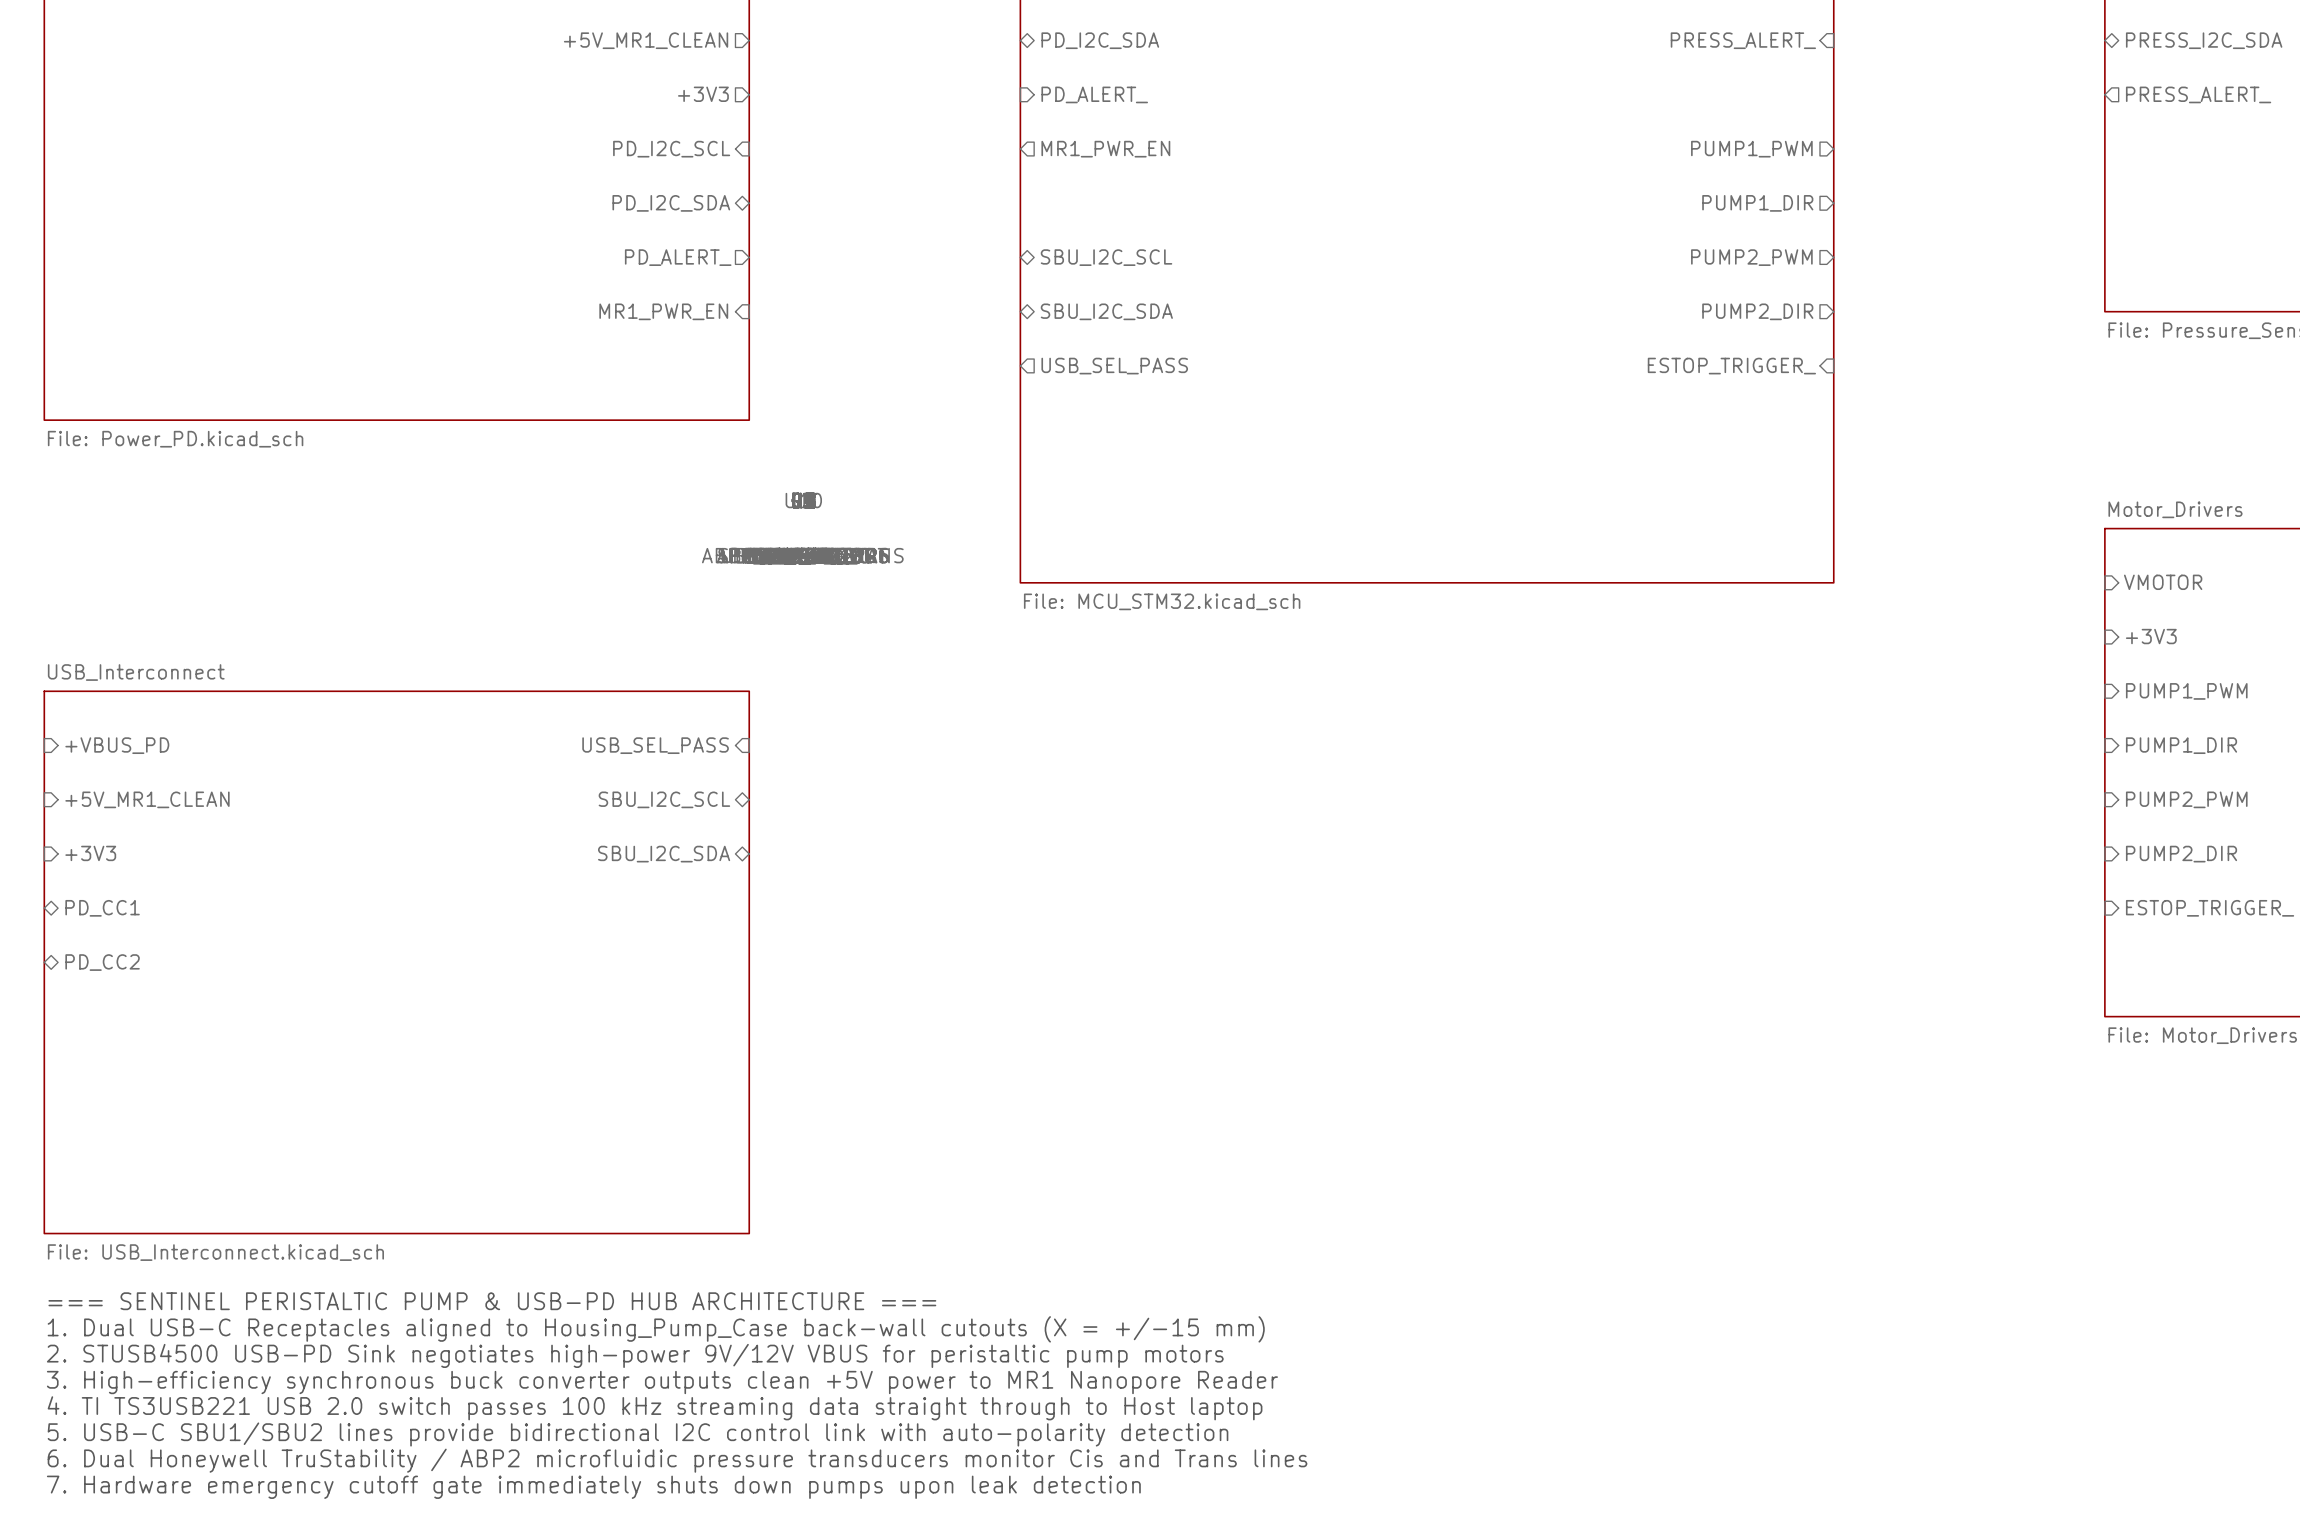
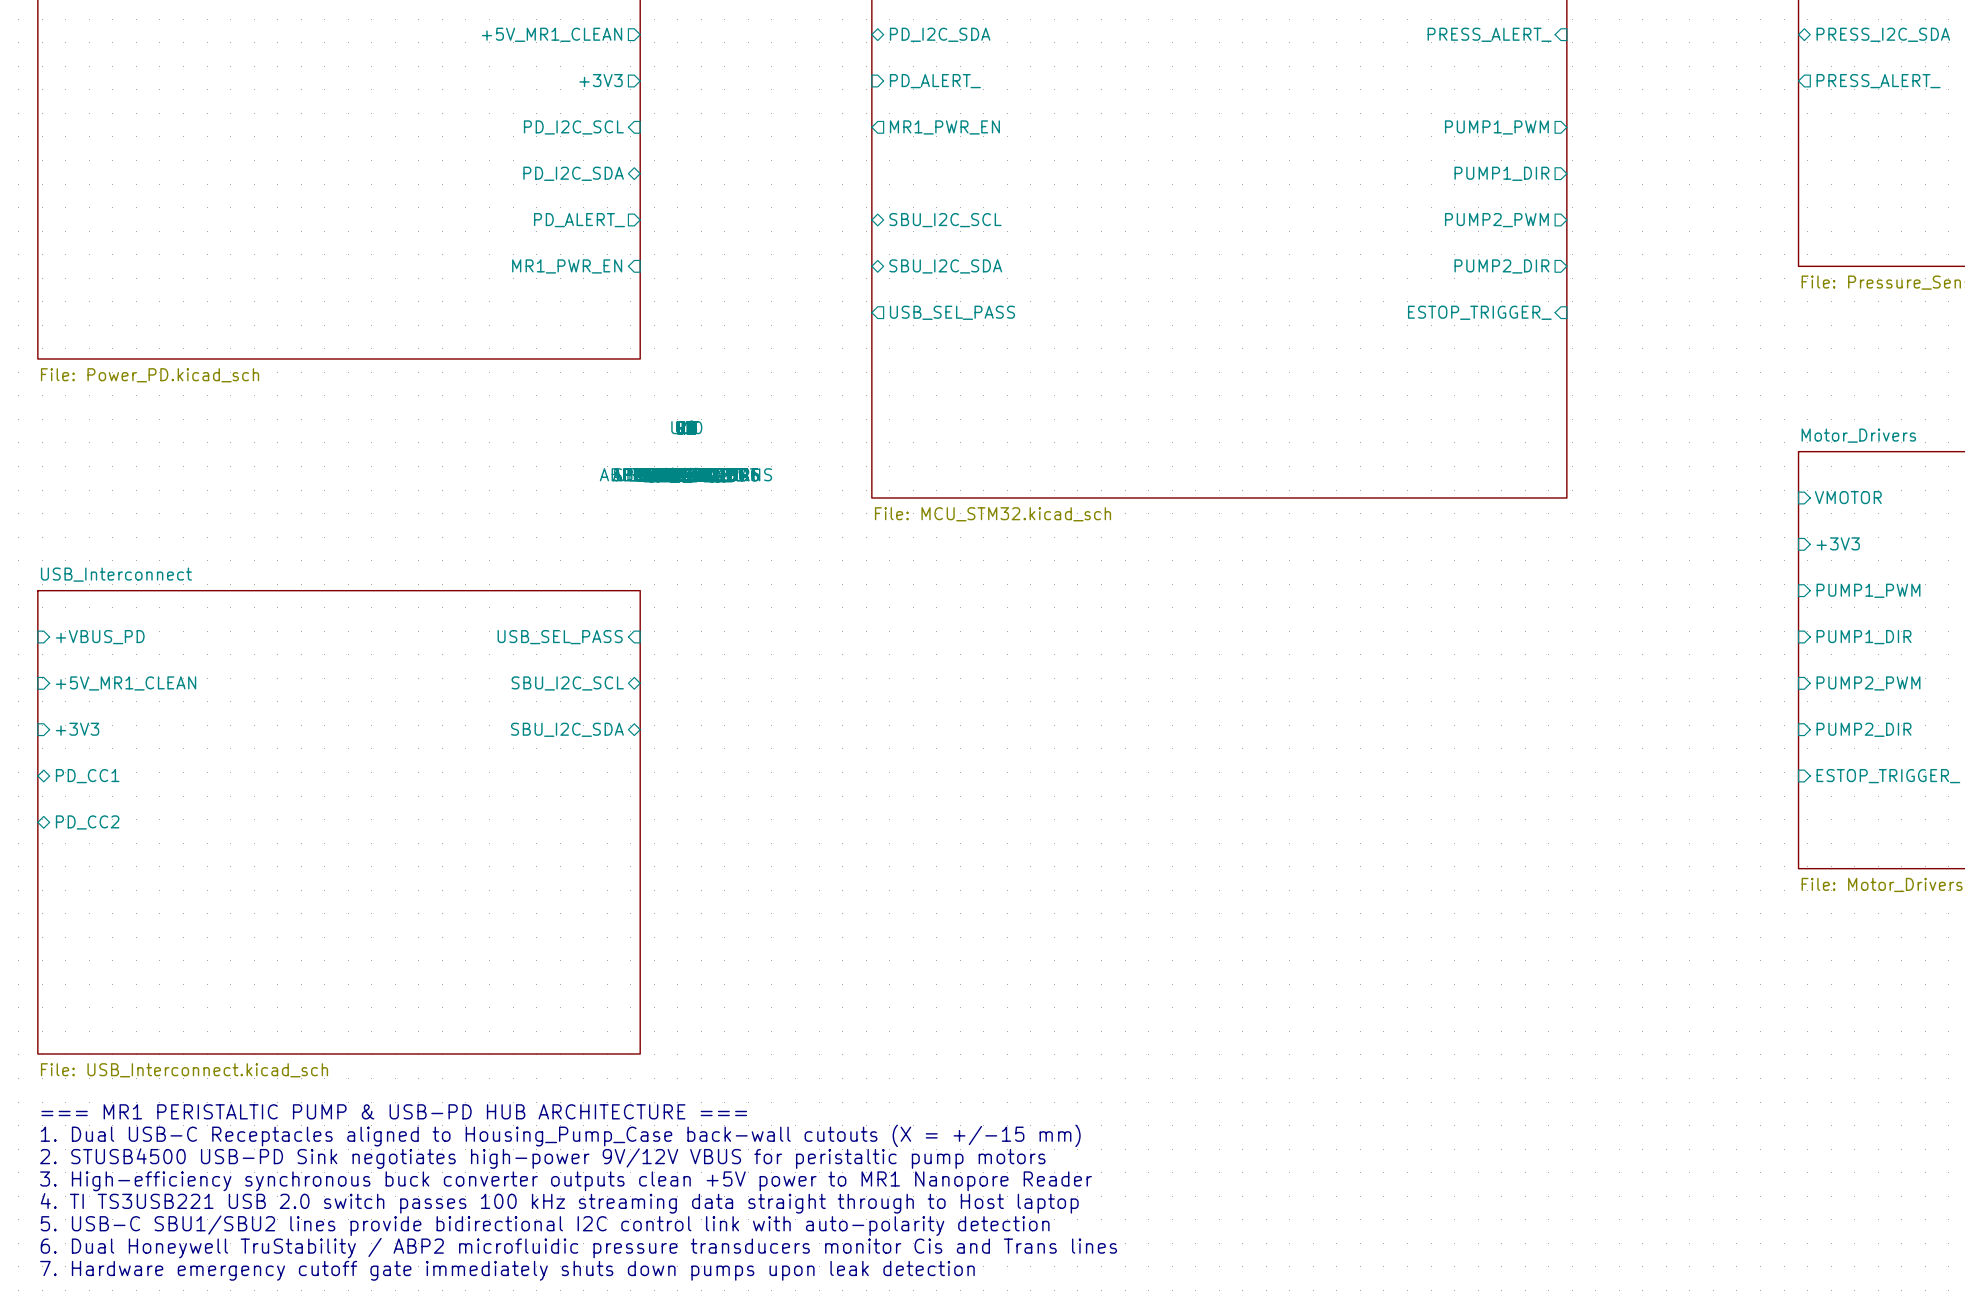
text: === SENTINEL PERISTALTIC PUMP & USB-PD HUB ARCHITECTURE === (492, 1301) -> === MR1 PERISTALTIC PUMP & USB-PD HUB ARCHITECTURE === (394, 1111)

